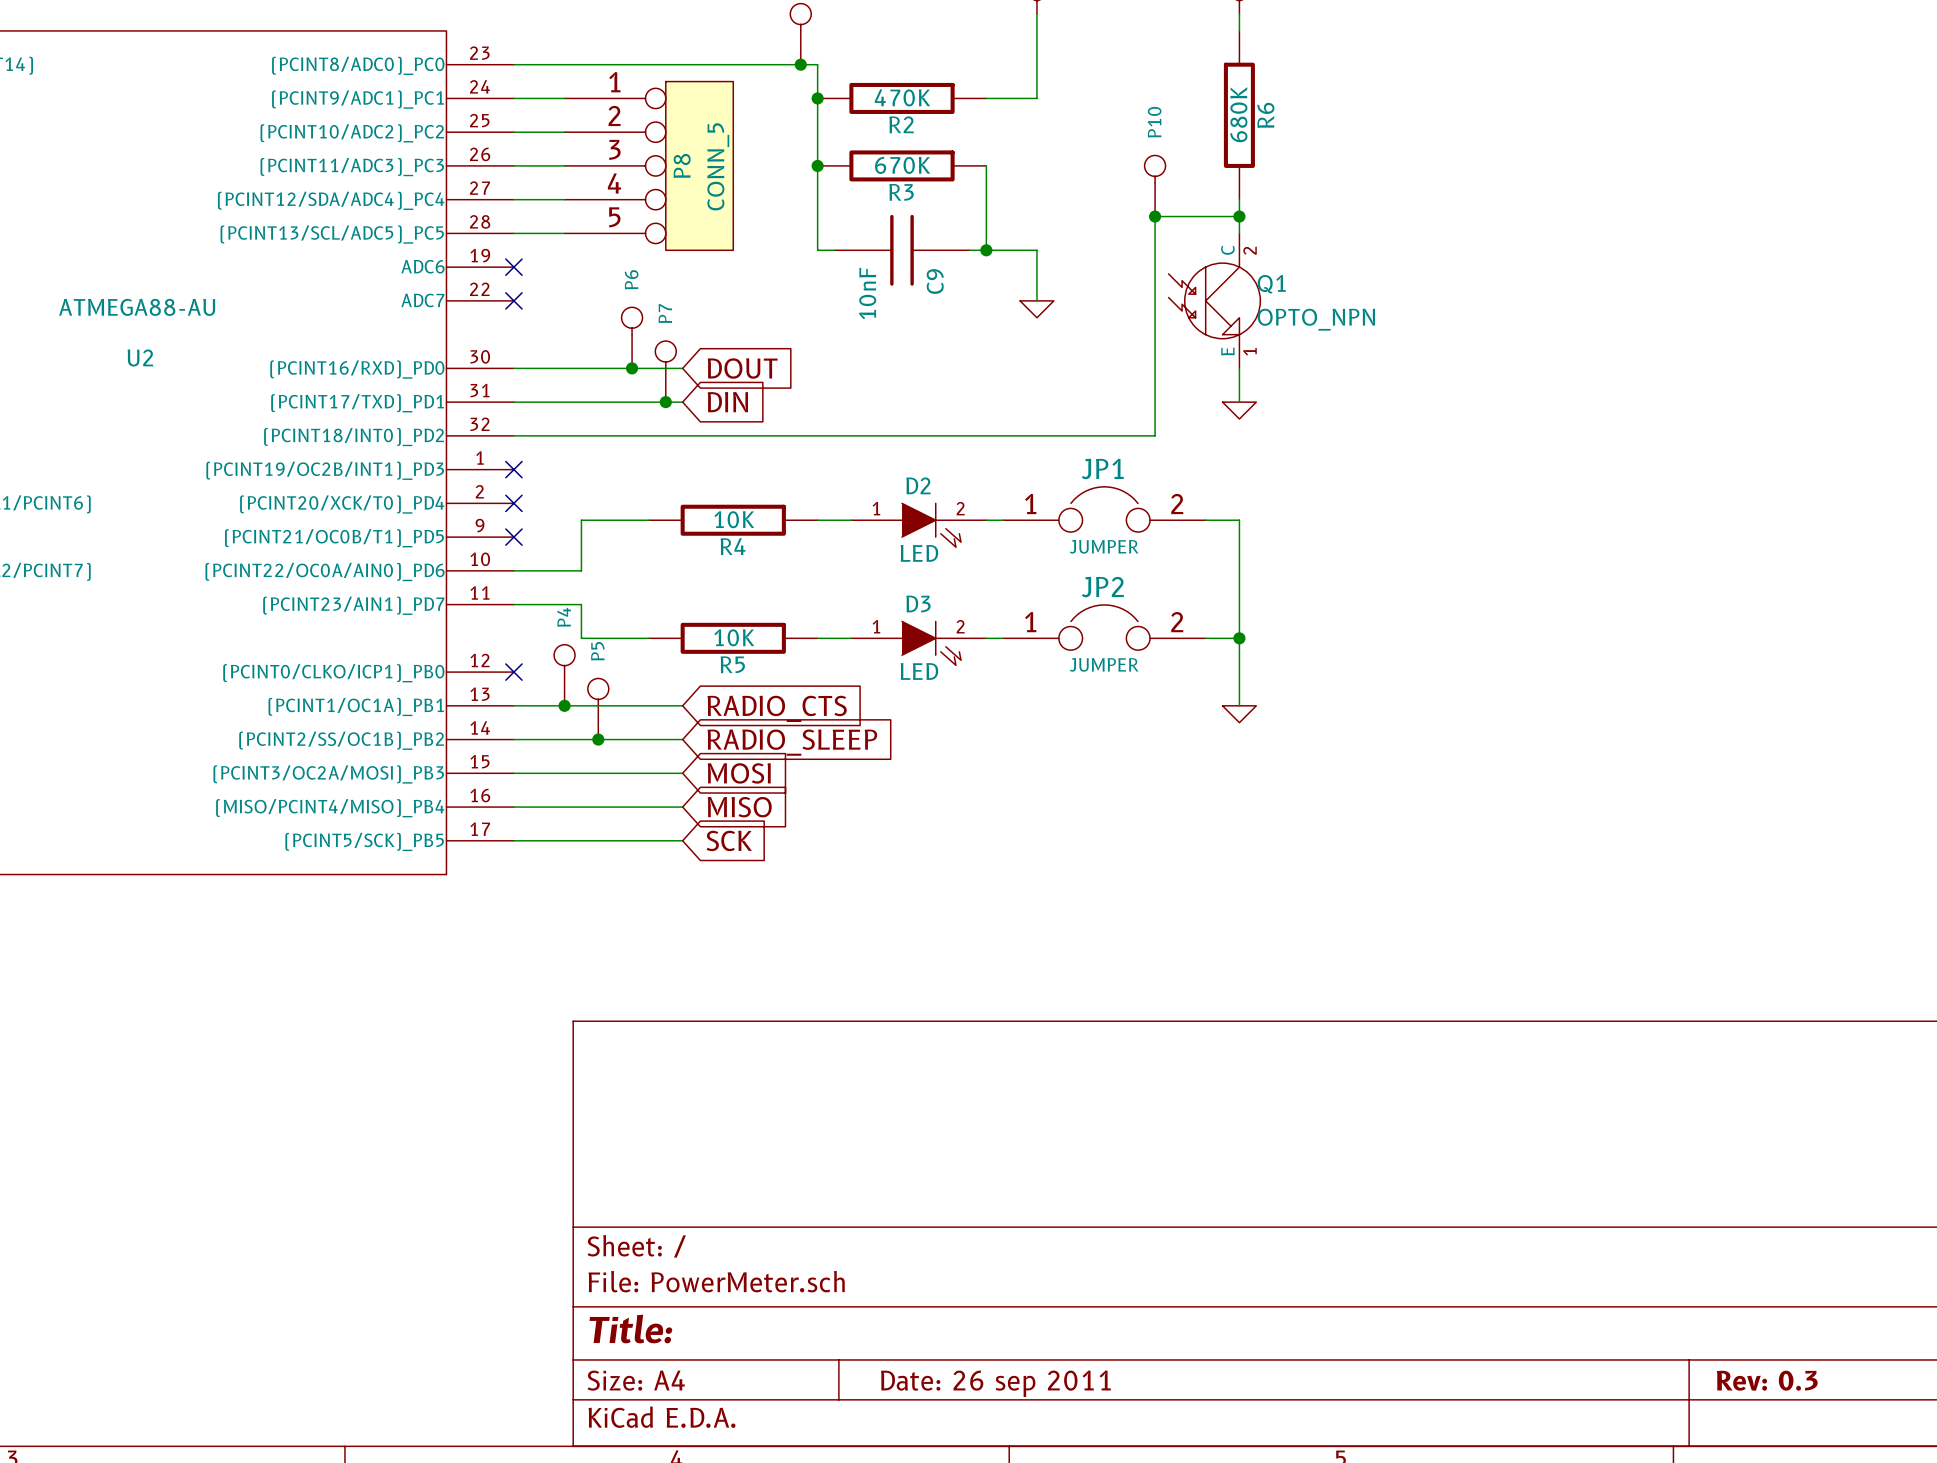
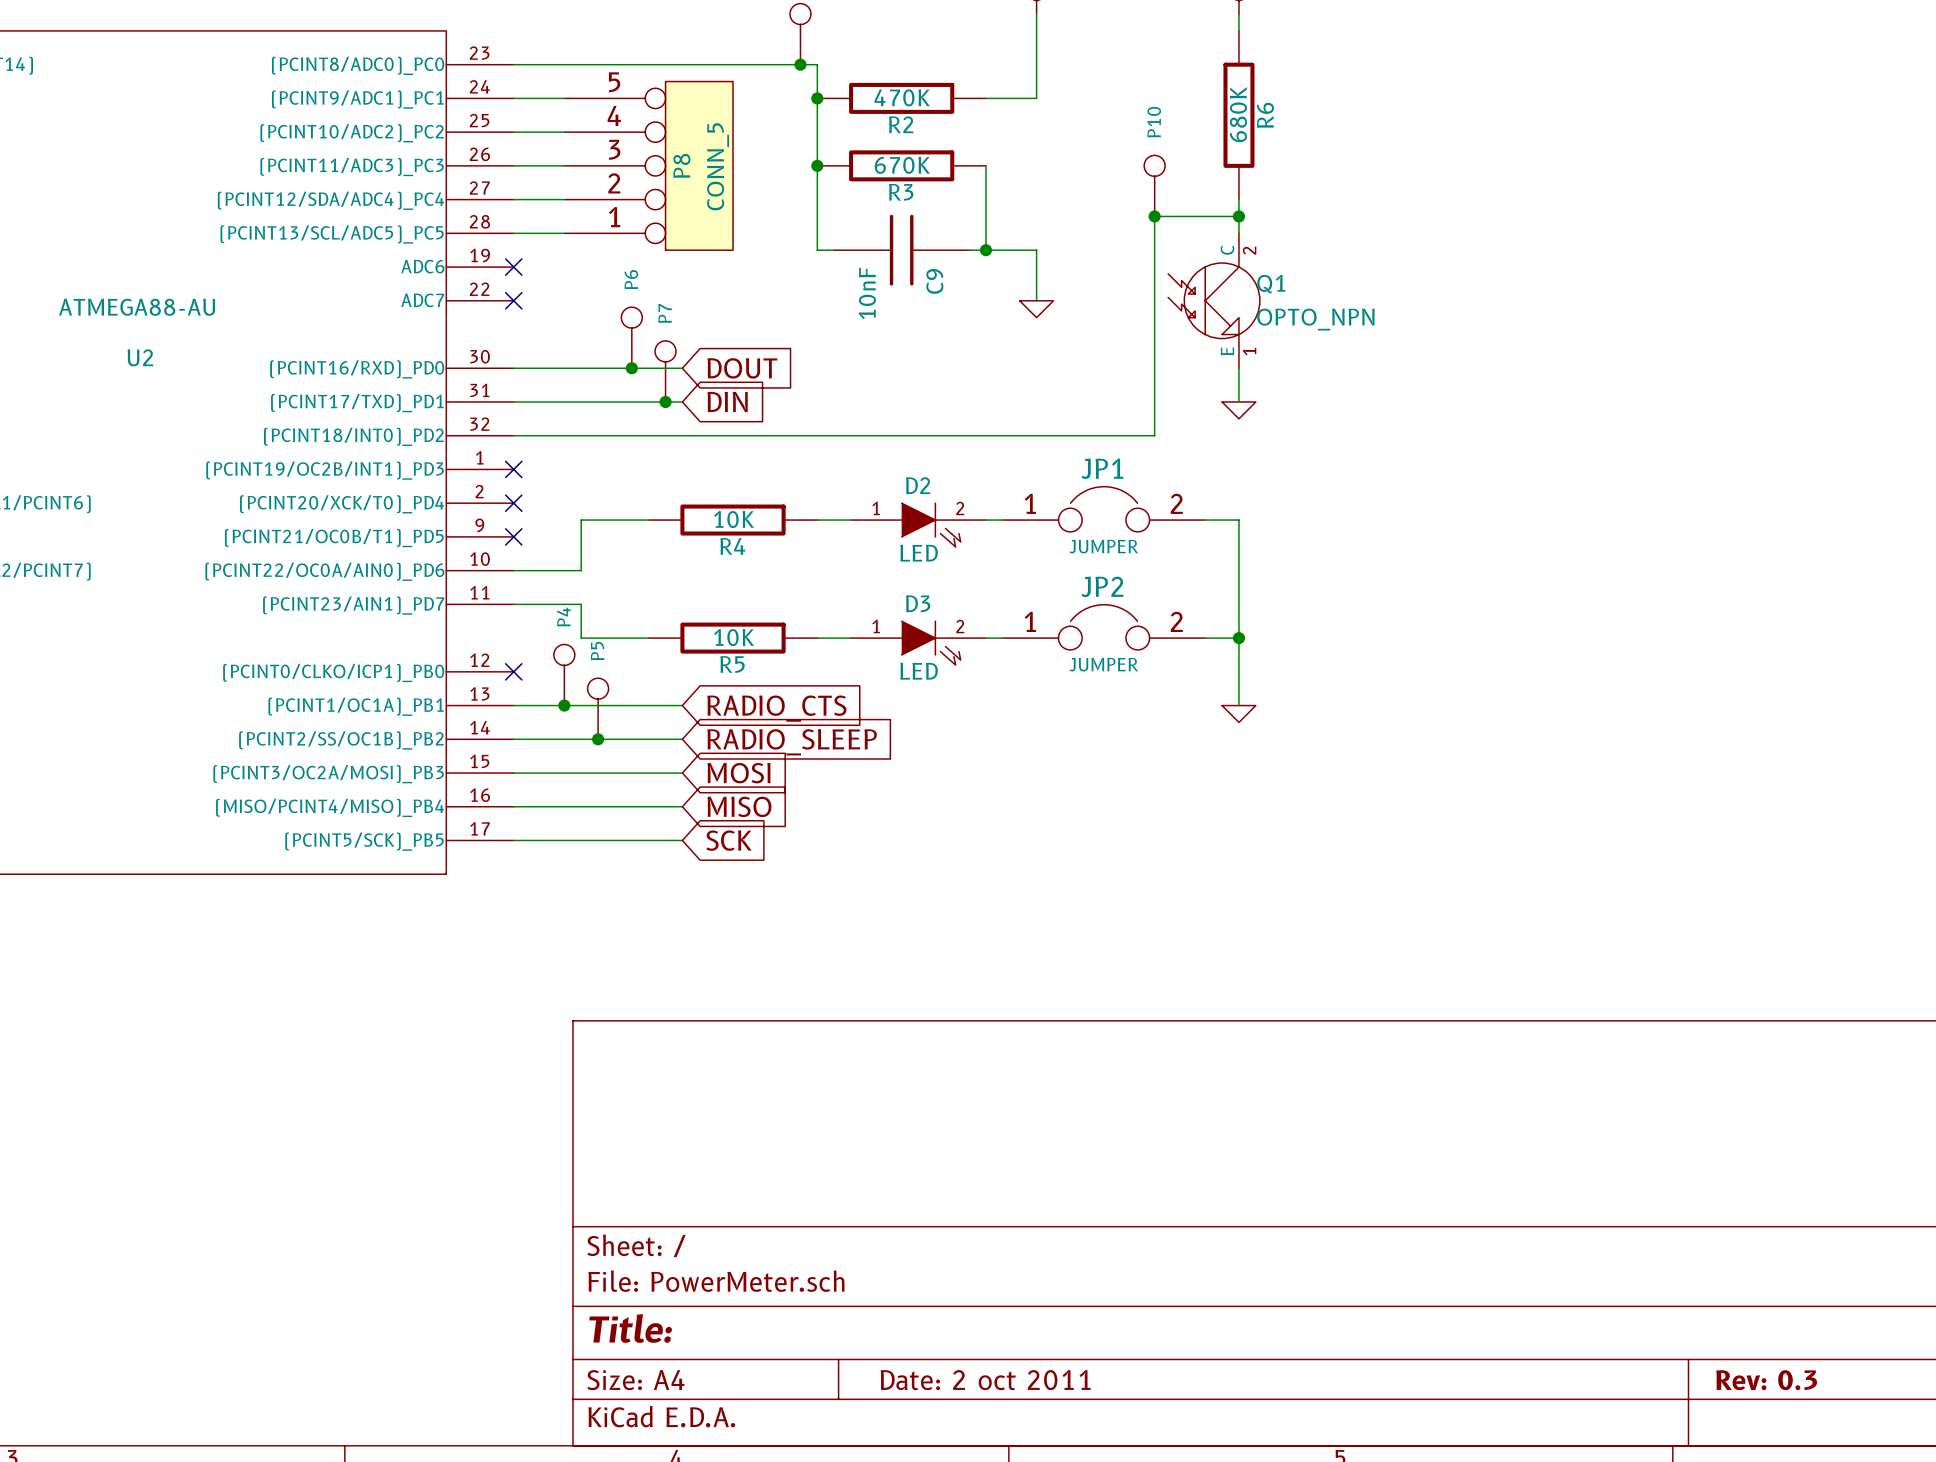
P8 flip: as is (699, 165) -> up-down (699, 165)
title block: Date: 26 sep 2011 (995, 1383) -> Date: 2 oct 2011 (985, 1380)

